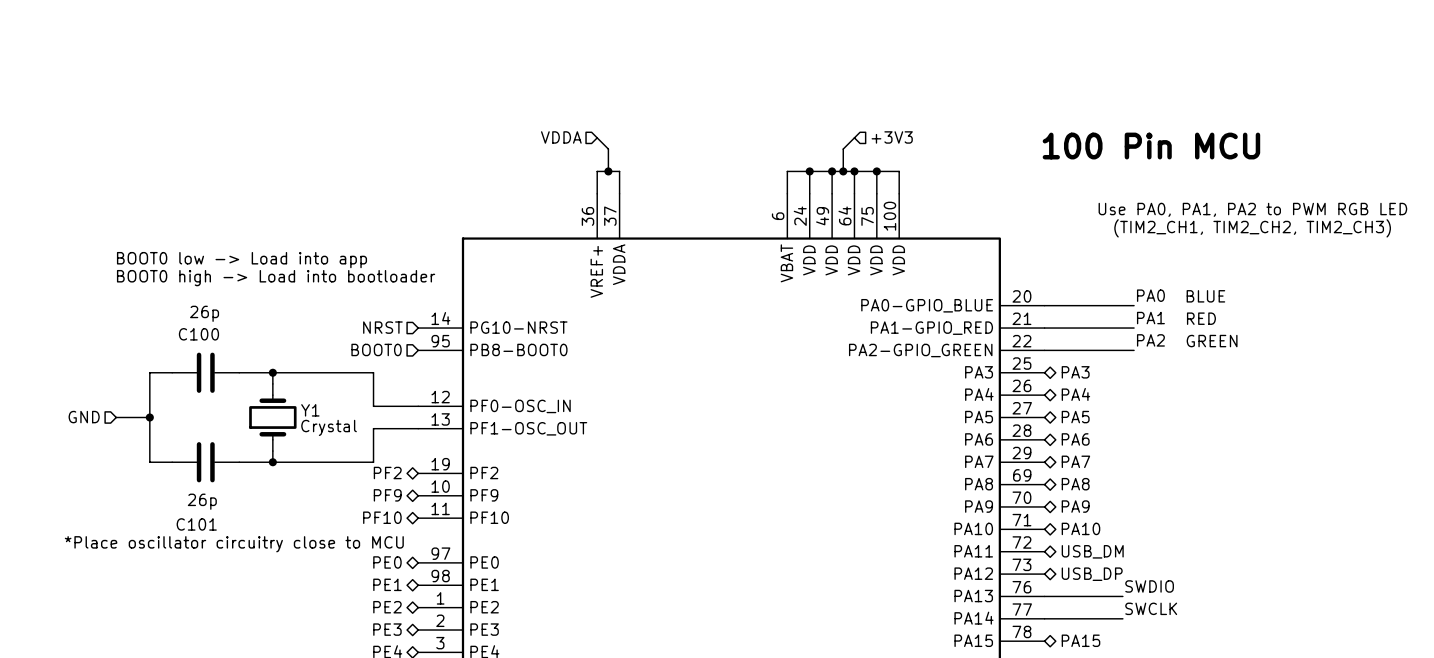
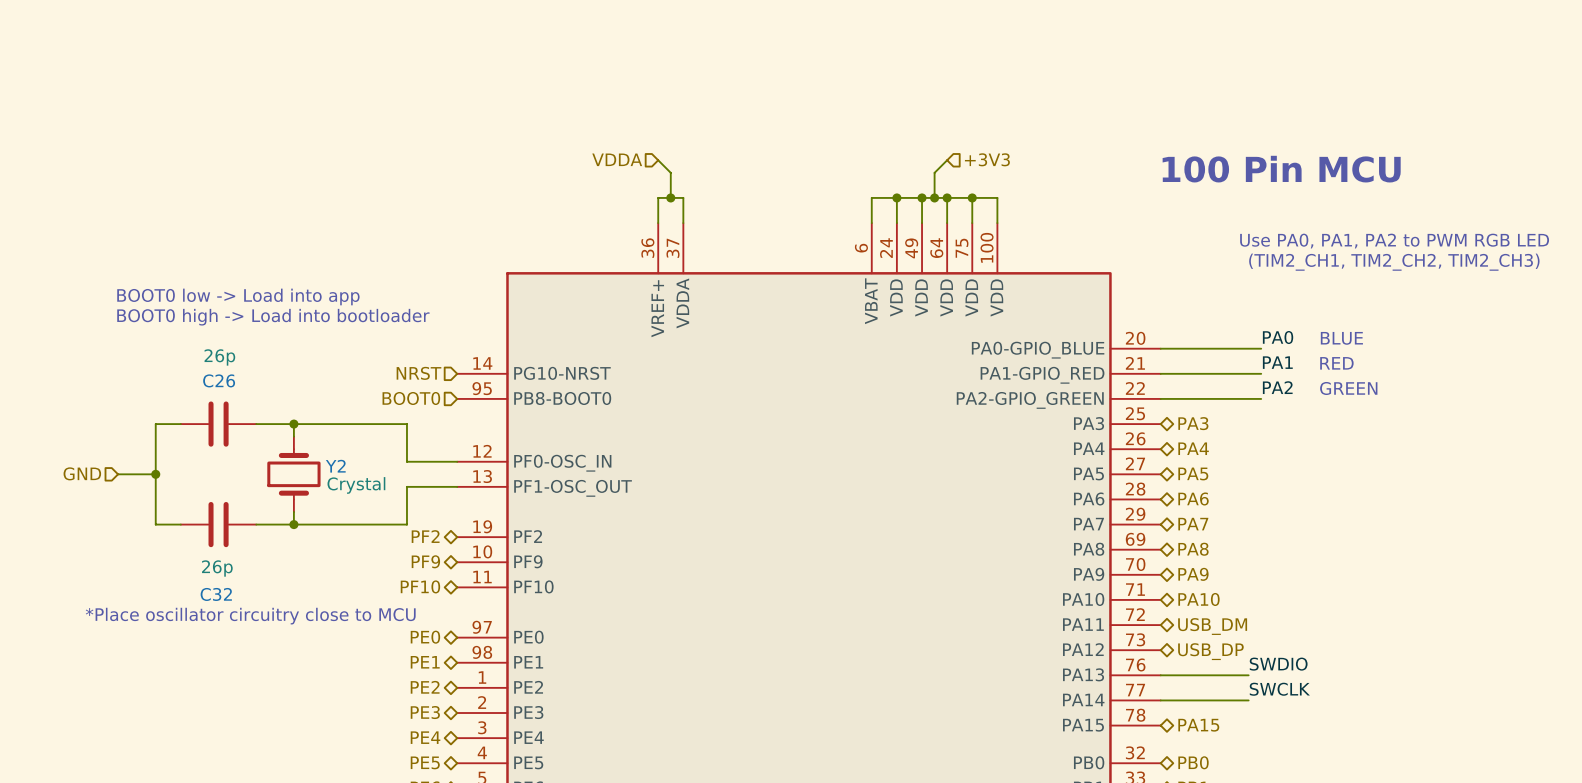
C100 name: C100 (198, 334) -> C26 (219, 380)
Y1 name: Y1 (310, 410) -> Y2 (335, 466)
C101 name: C101 (196, 524) -> C32 (216, 594)

